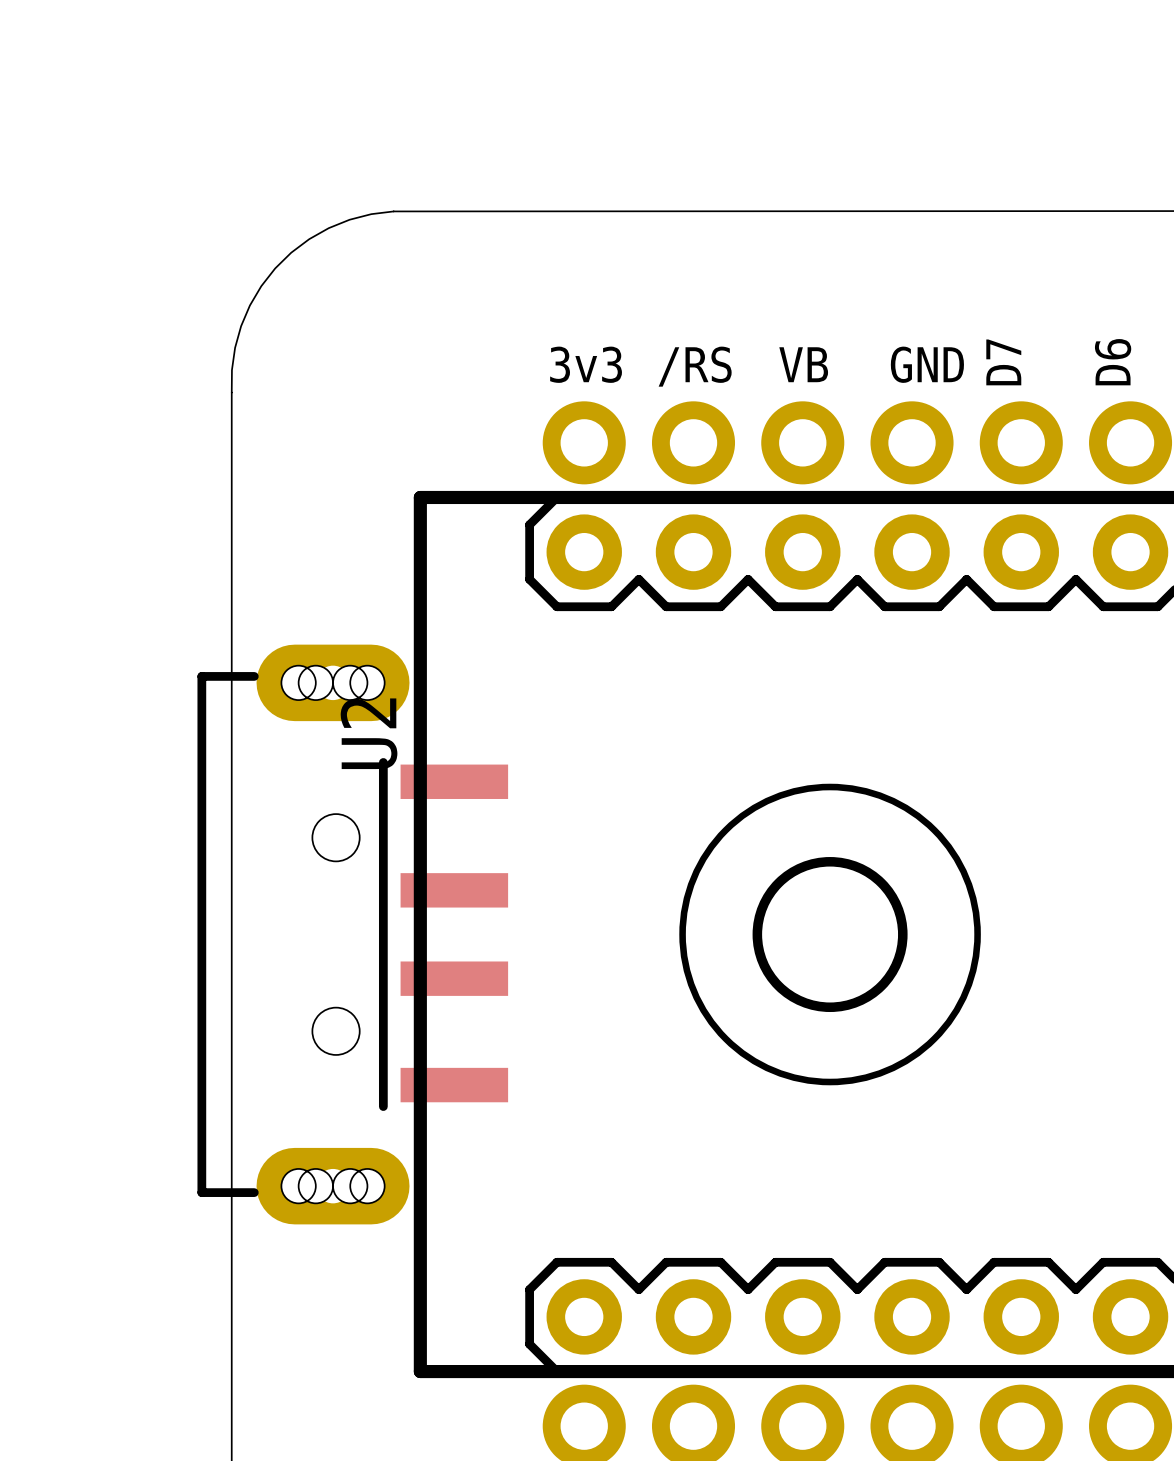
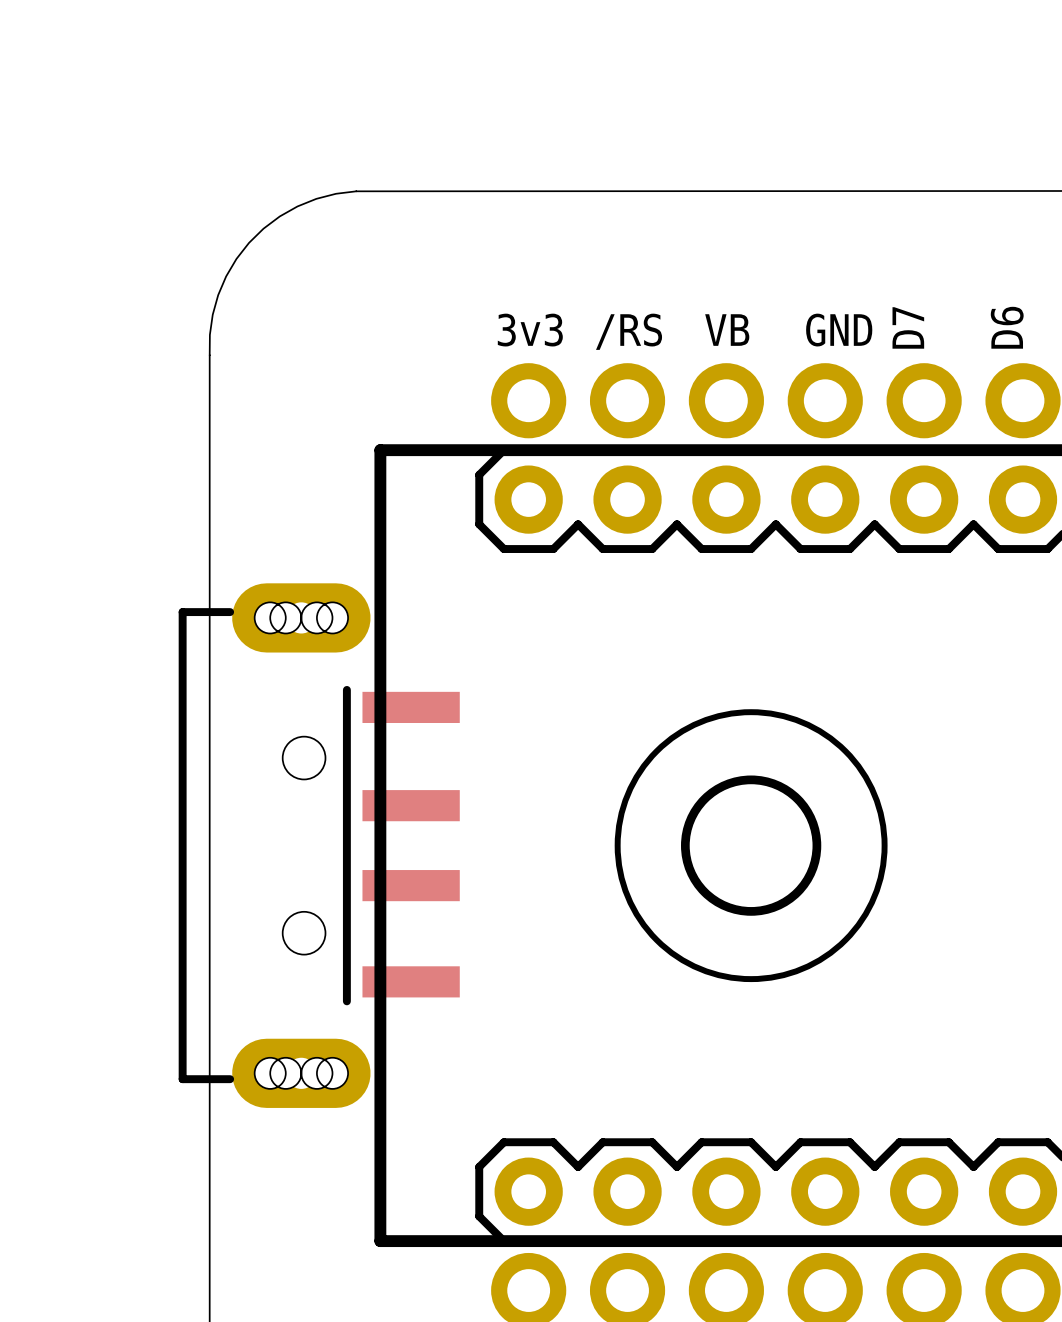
U2 name: U2 (369, 733) -> none

